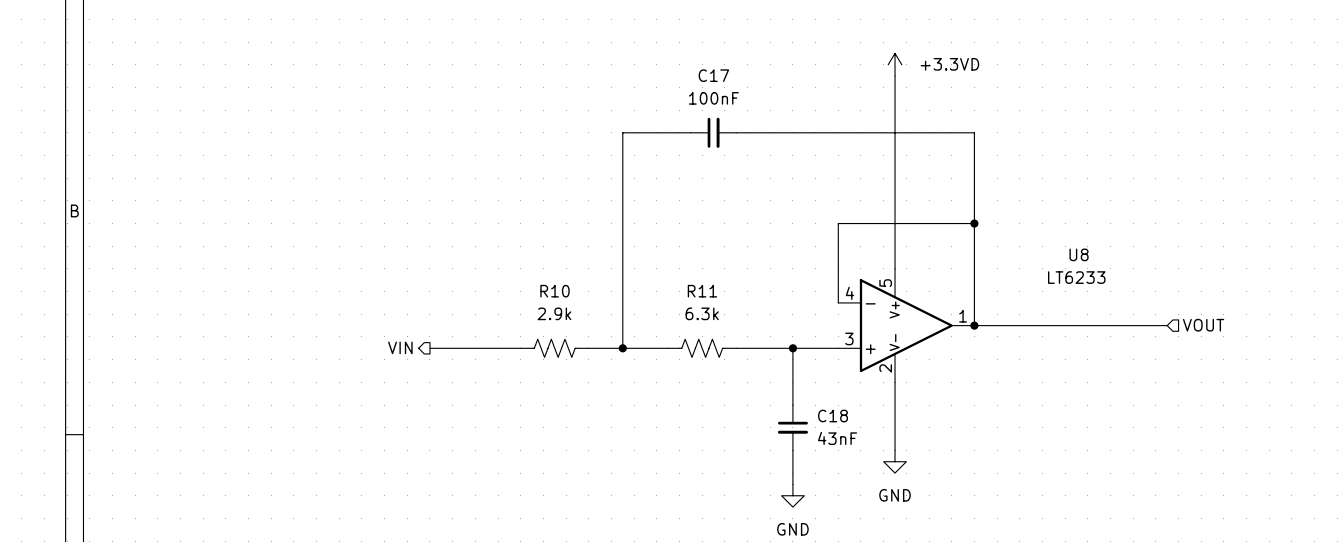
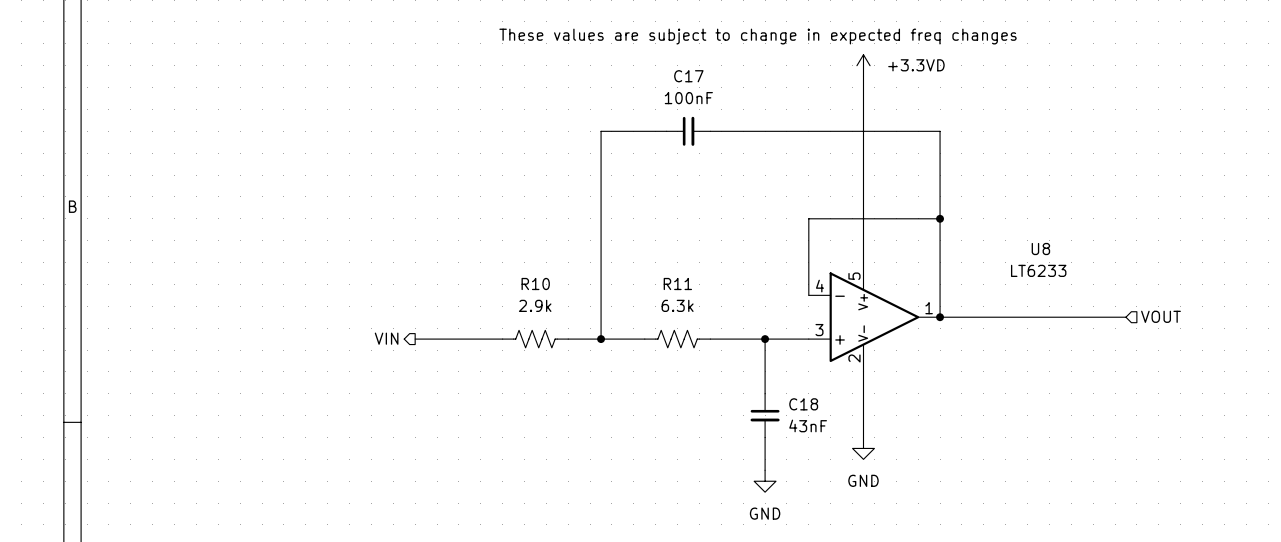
text: none -> These values are subject to change in expected freq changes (758, 36)

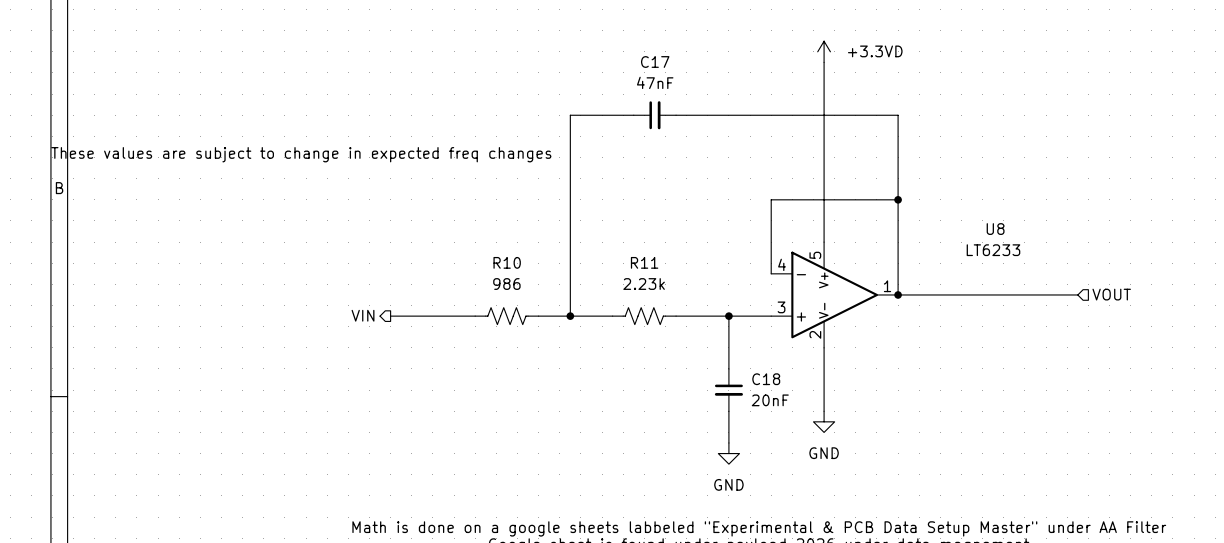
text: These values are subject to change in expected freq changes (758, 36) -> none
C17 value: 100nF (688, 98) -> 47nF (655, 82)
text: none -> These values are subject to change in expected freq changes (301, 154)
R10 value: 2.9k (535, 305) -> 986 (506, 284)
R11 value: 6.3k (677, 305) -> 2.23k (644, 284)
C18 value: 43nF (808, 425) -> 20nF (770, 400)

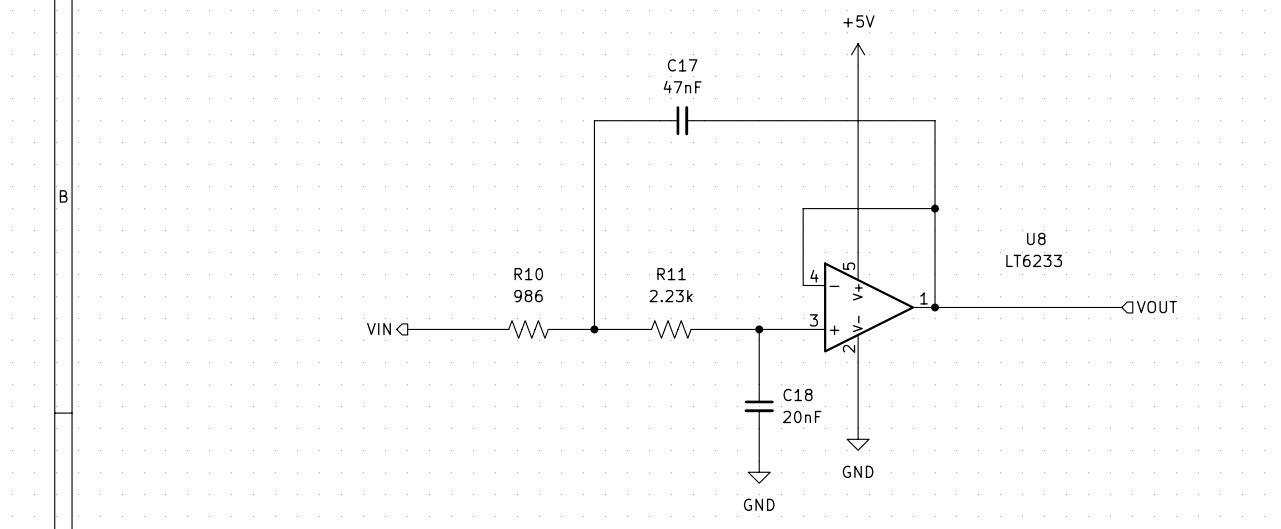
power symbol: +3.3VD (824, 51) -> +5V (858, 54)
text: These values are subject to change in expected freq changes (301, 154) -> none

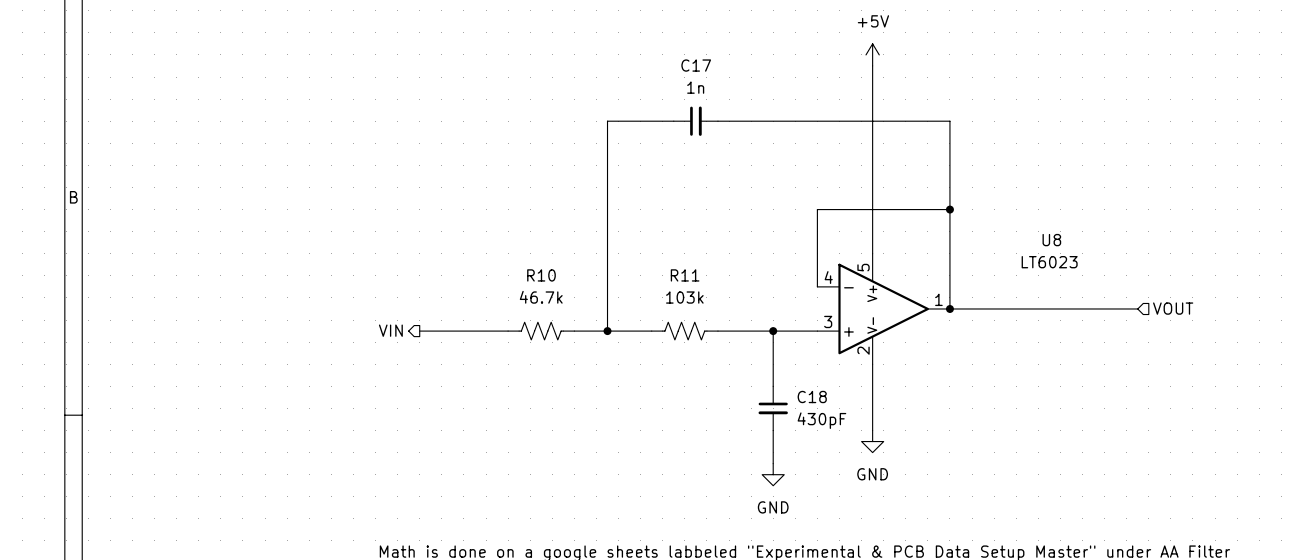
C17 value: 47nF (682, 87) -> 1n (695, 87)
U8 value: LT6233 (1034, 260) -> LT6023 (1049, 262)
R10 value: 986 (528, 296) -> 46.7k (541, 297)
R11 value: 2.23k (671, 296) -> 103k (684, 297)
C18 value: 20nF (802, 416) -> 430pF (821, 420)

